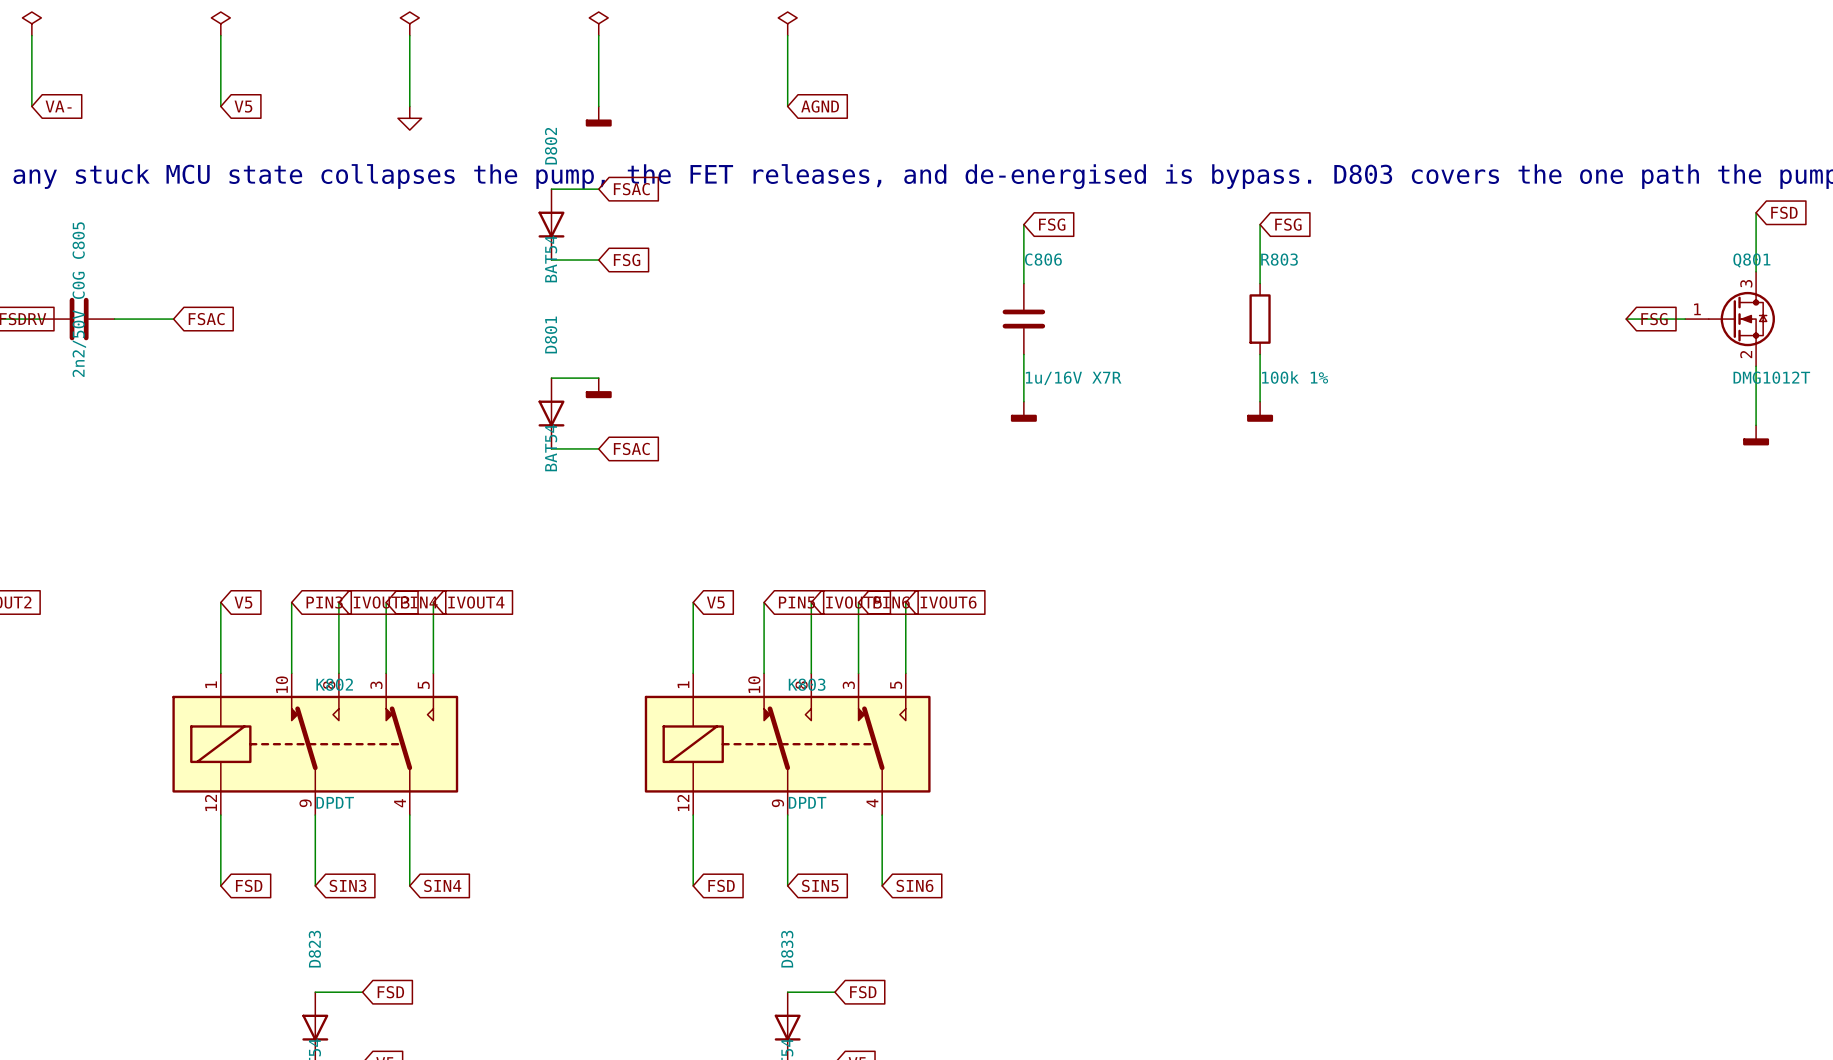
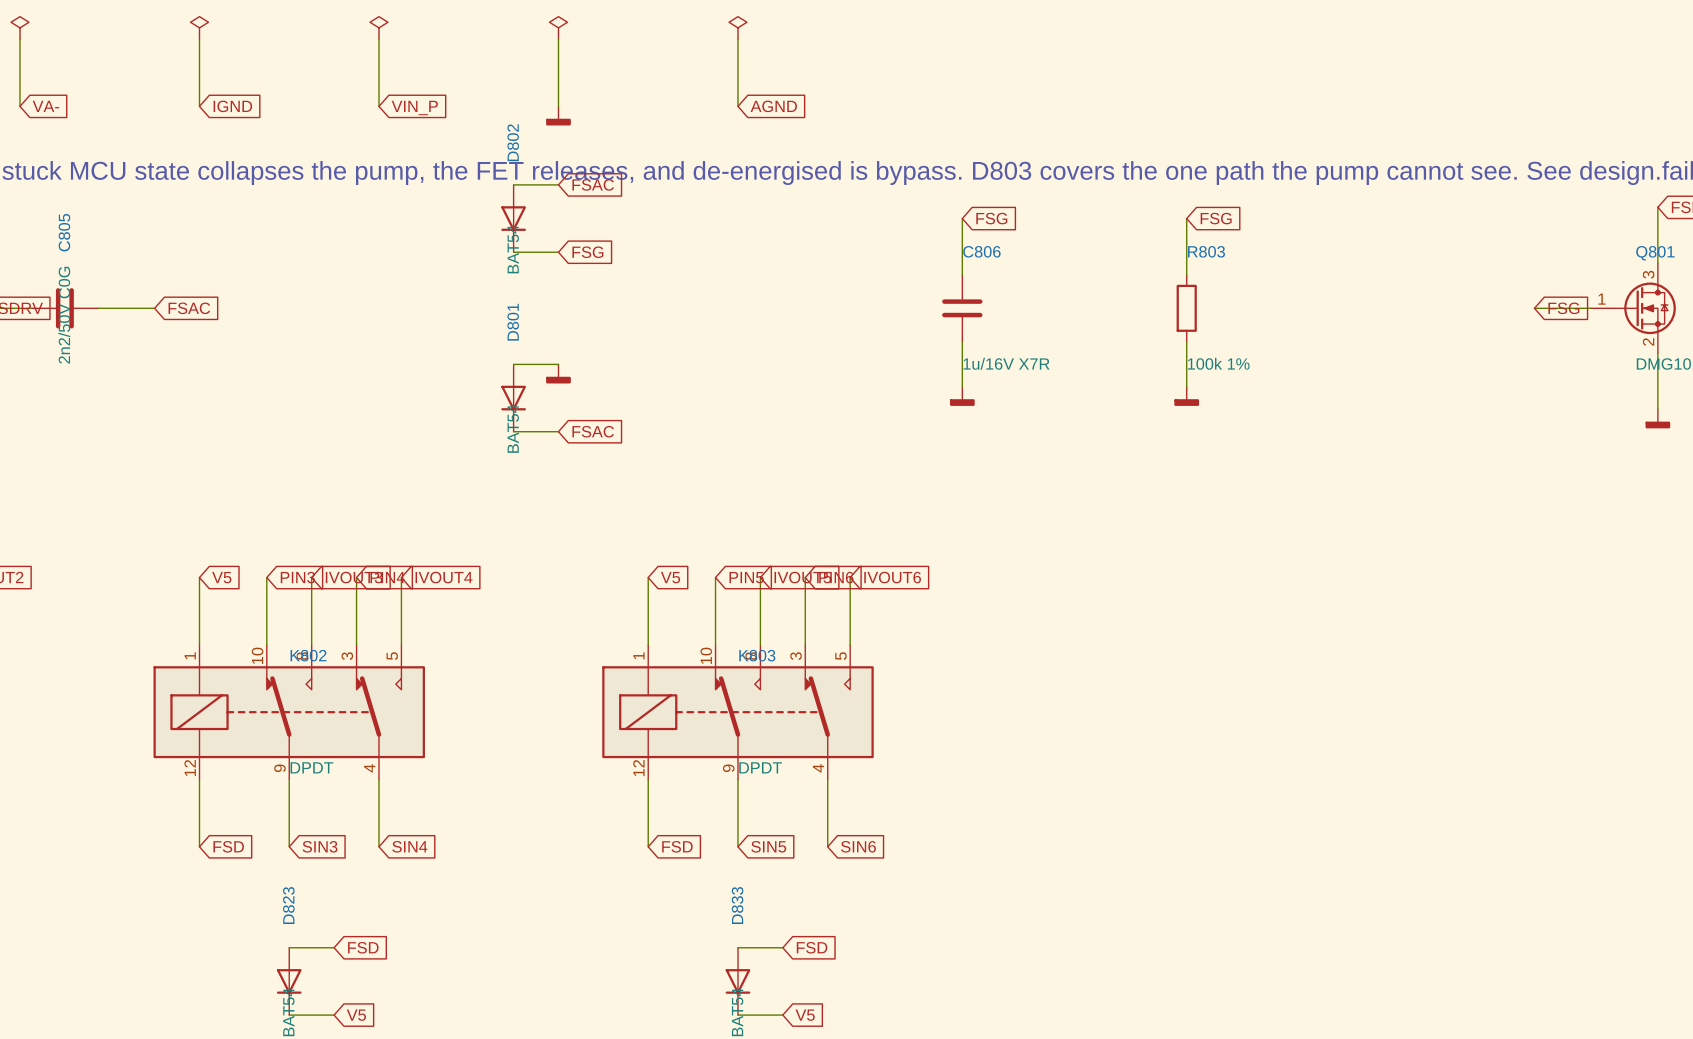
global label: V5 (243, 106) -> IGND (232, 106)
global label: none -> VIN_P (414, 108)
power symbol: (409, 118) -> none

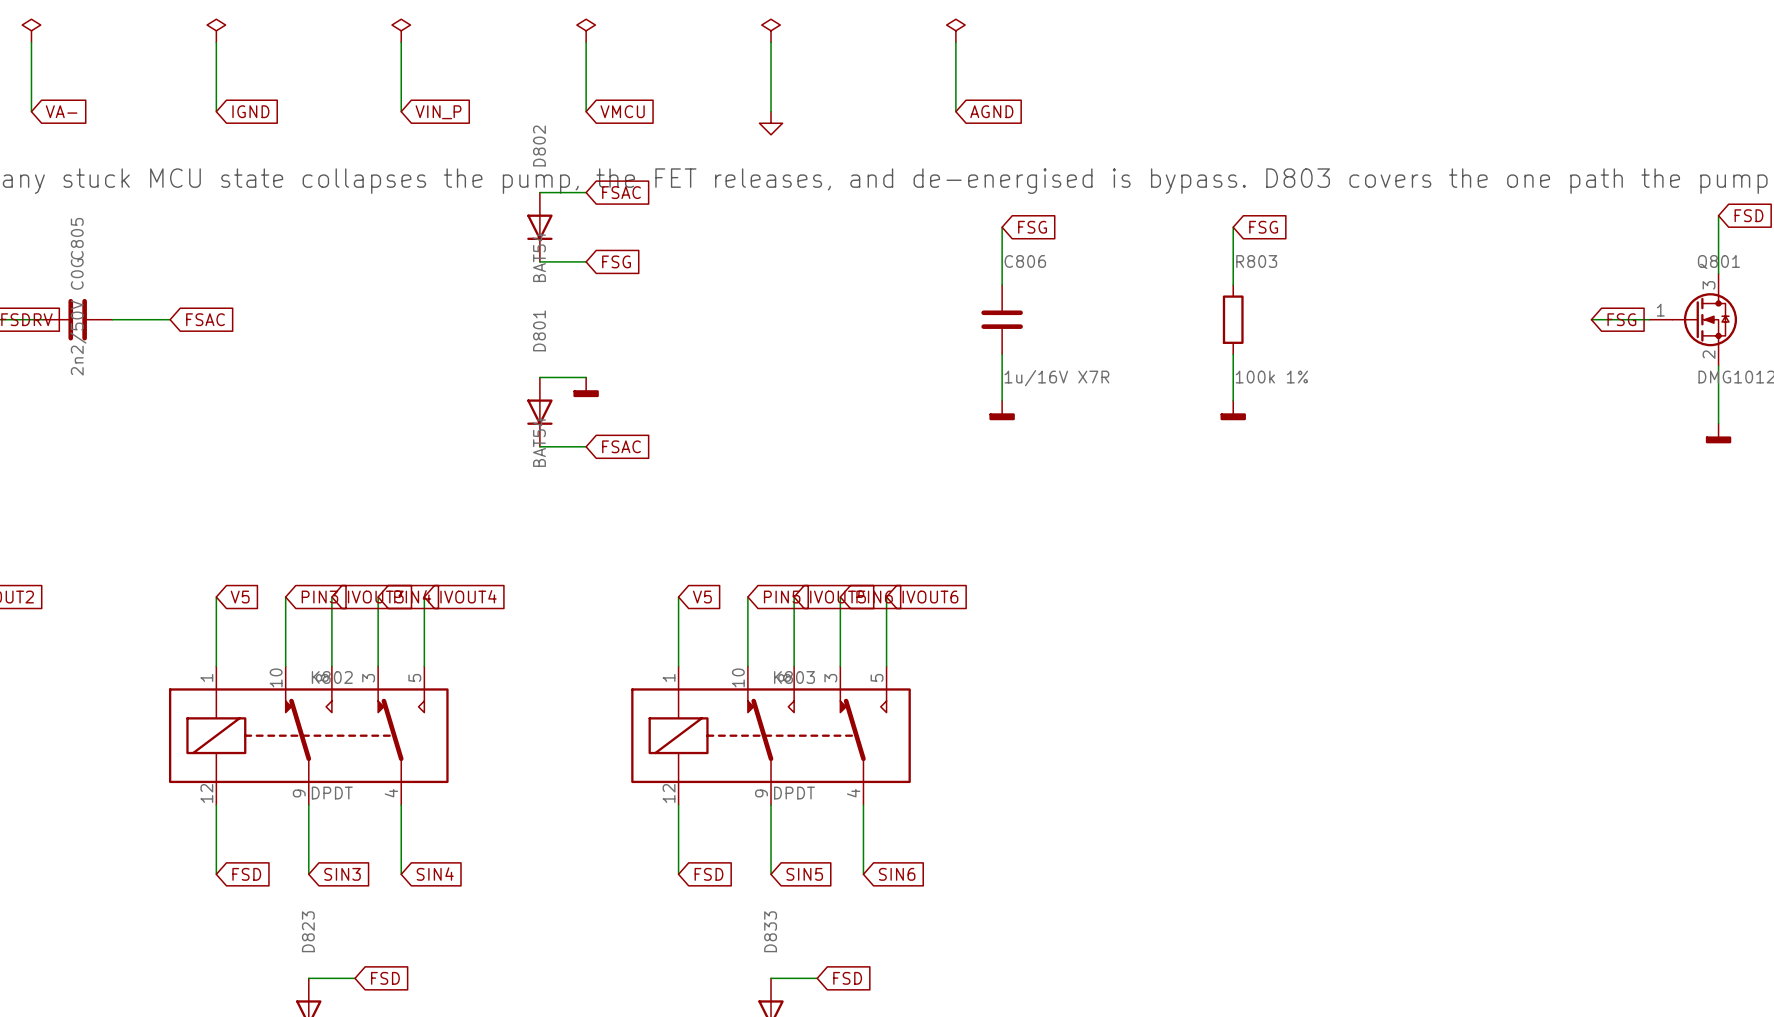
power symbol: none -> (955, 30)
wire: none -> (955, 42) (955, 111)
global label: none -> VMCU (622, 111)
global label position: AGND (773, 106) -> AGND (991, 111)
power symbol: (558, 115) -> none
power symbol: none -> (771, 123)

